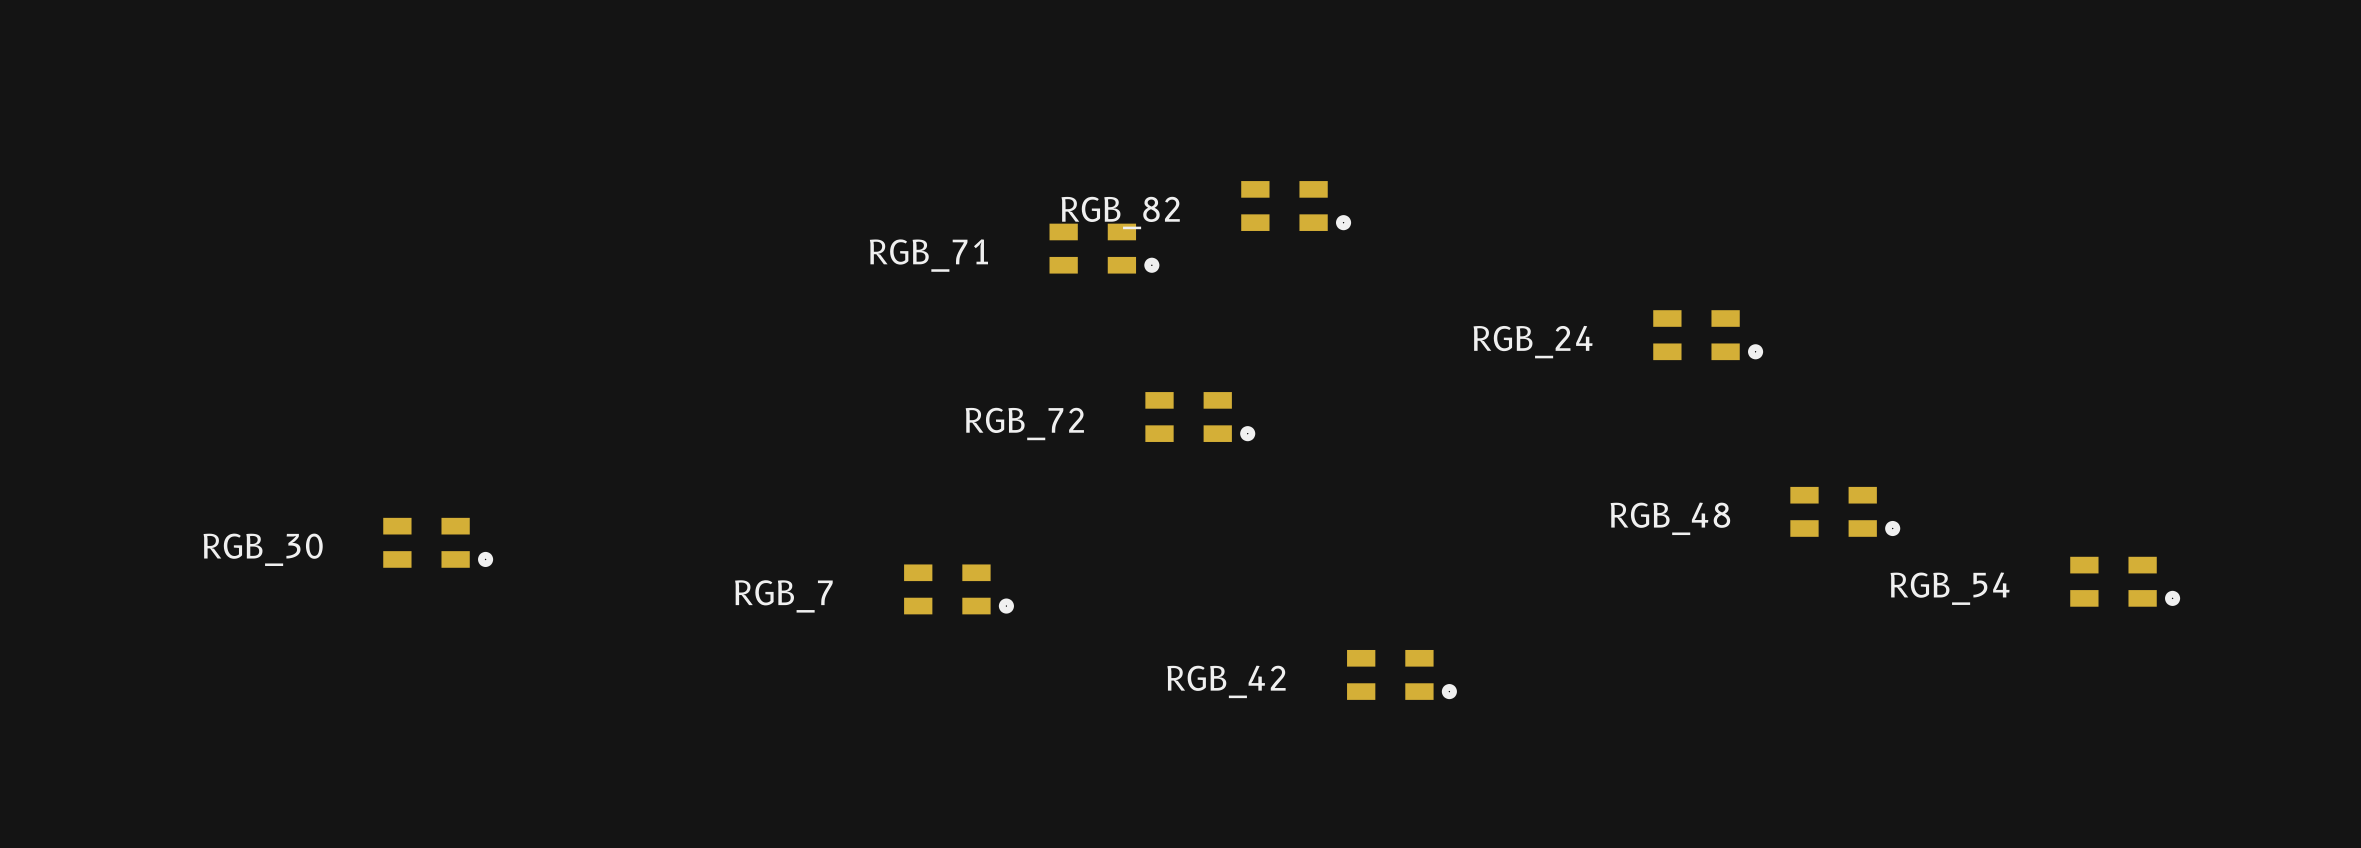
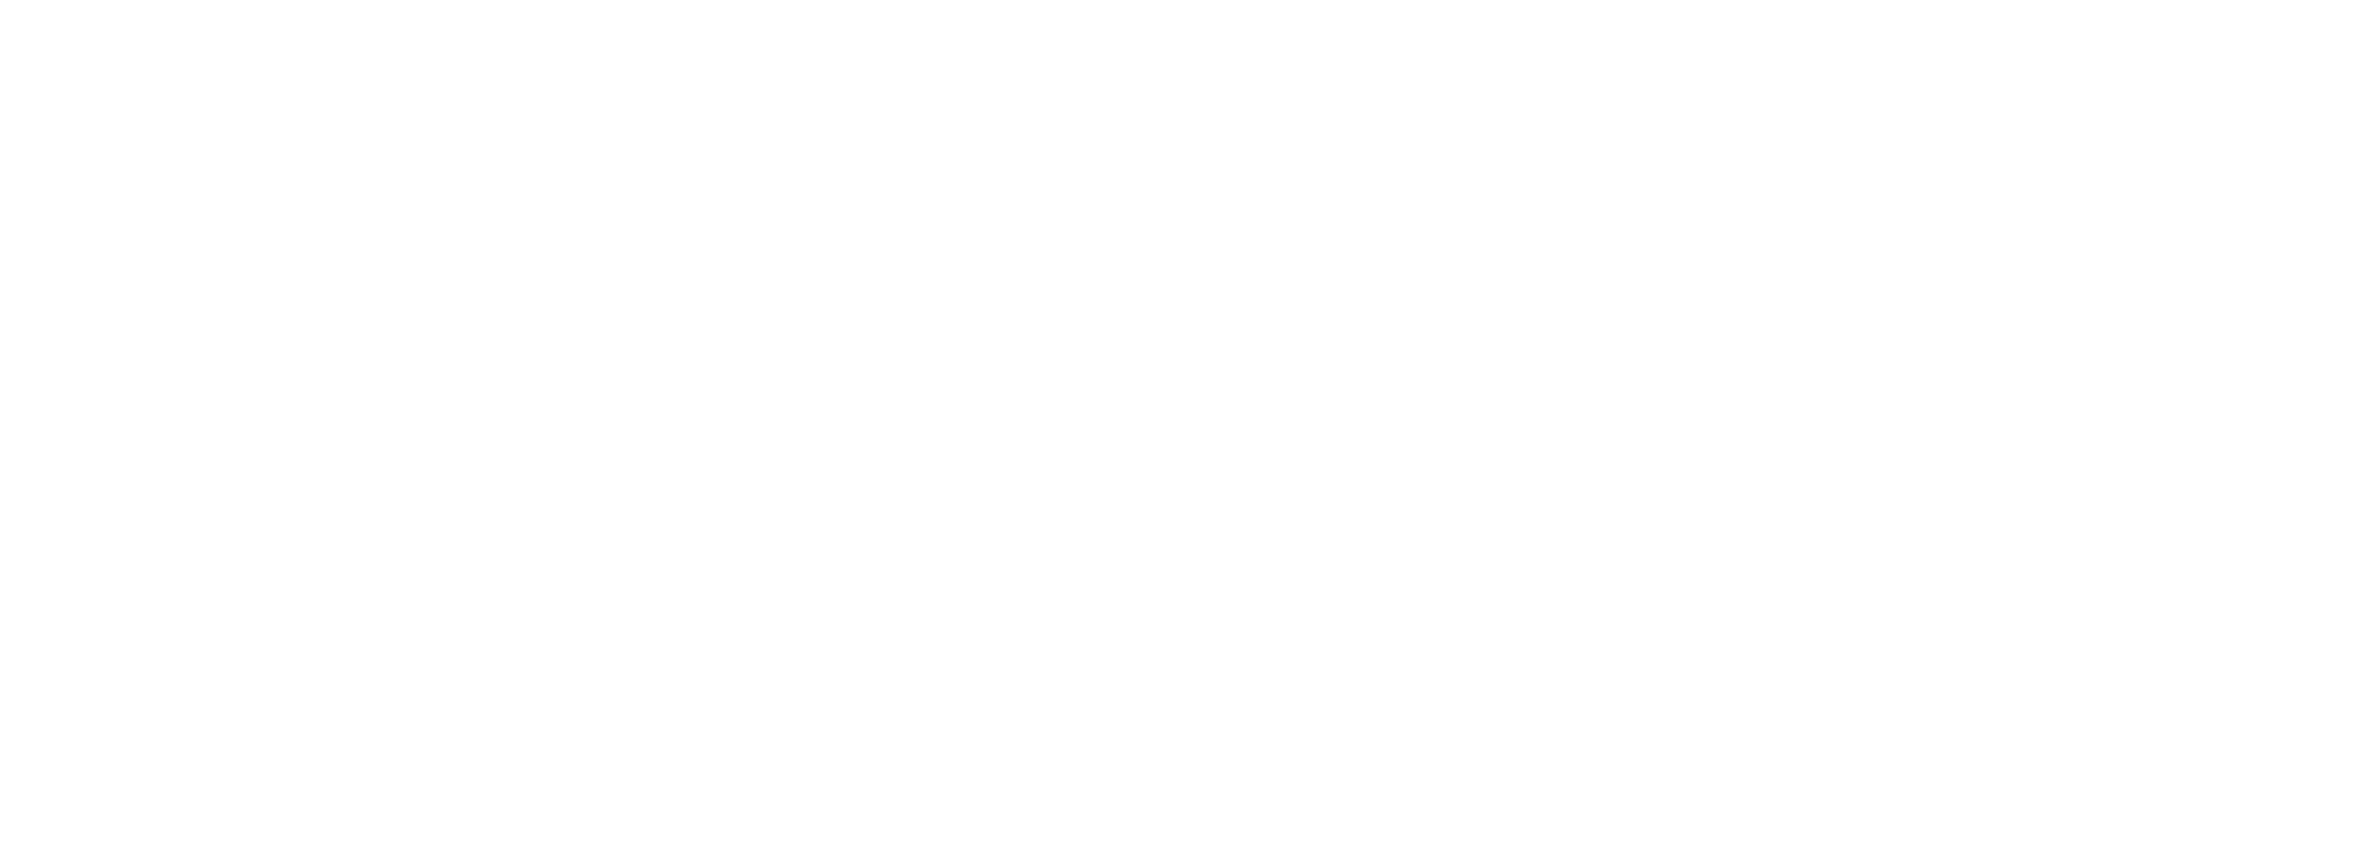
RGB_82: (1296, 206) -> none
RGB_71: (1104, 248) -> none
RGB_24: (1708, 335) -> none
RGB_72: (1200, 417) -> none
RGB_48: (1845, 511) -> none
RGB_30: (438, 542) -> none
RGB_54: (2125, 581) -> none
RGB_7: (959, 589) -> none
RGB_42: (1401, 674) -> none

